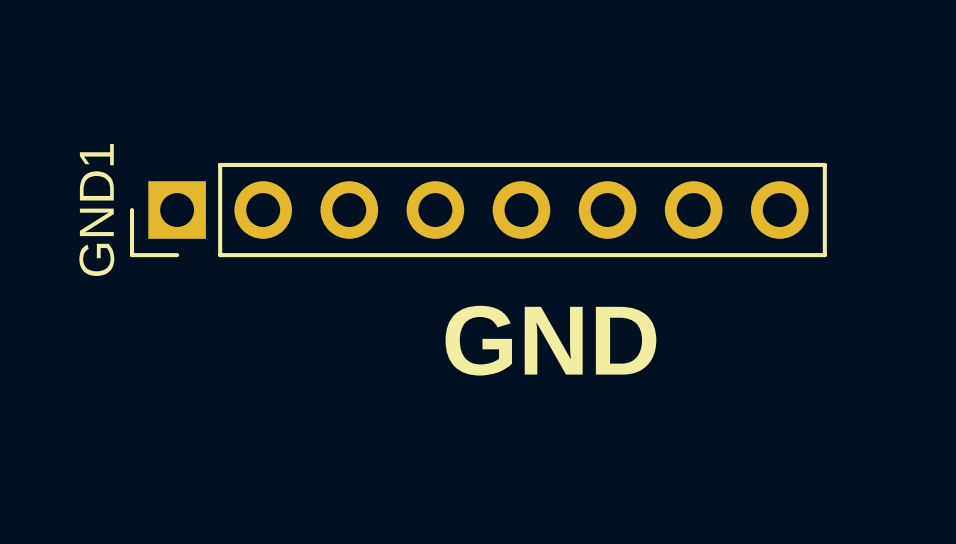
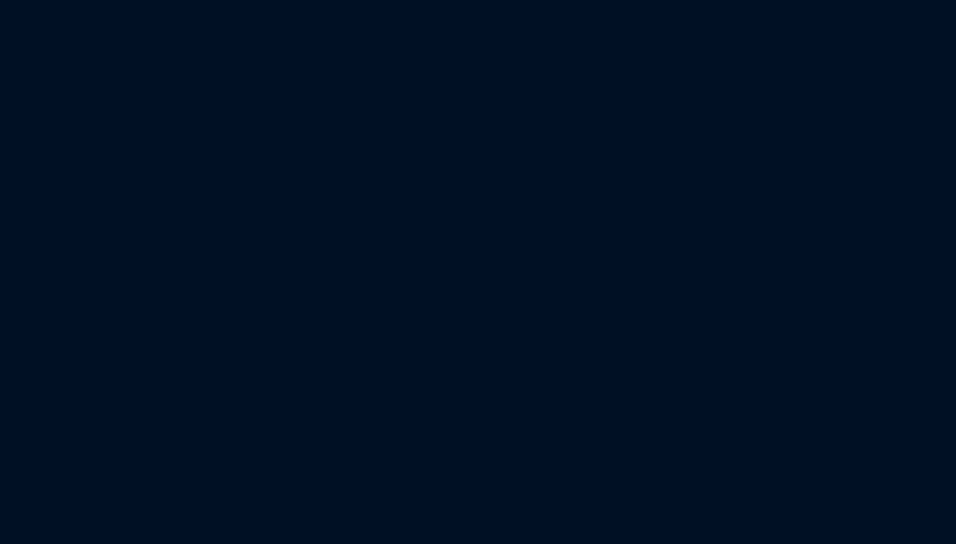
GND1: (478, 210) -> none
text: GND (550, 340) -> none

